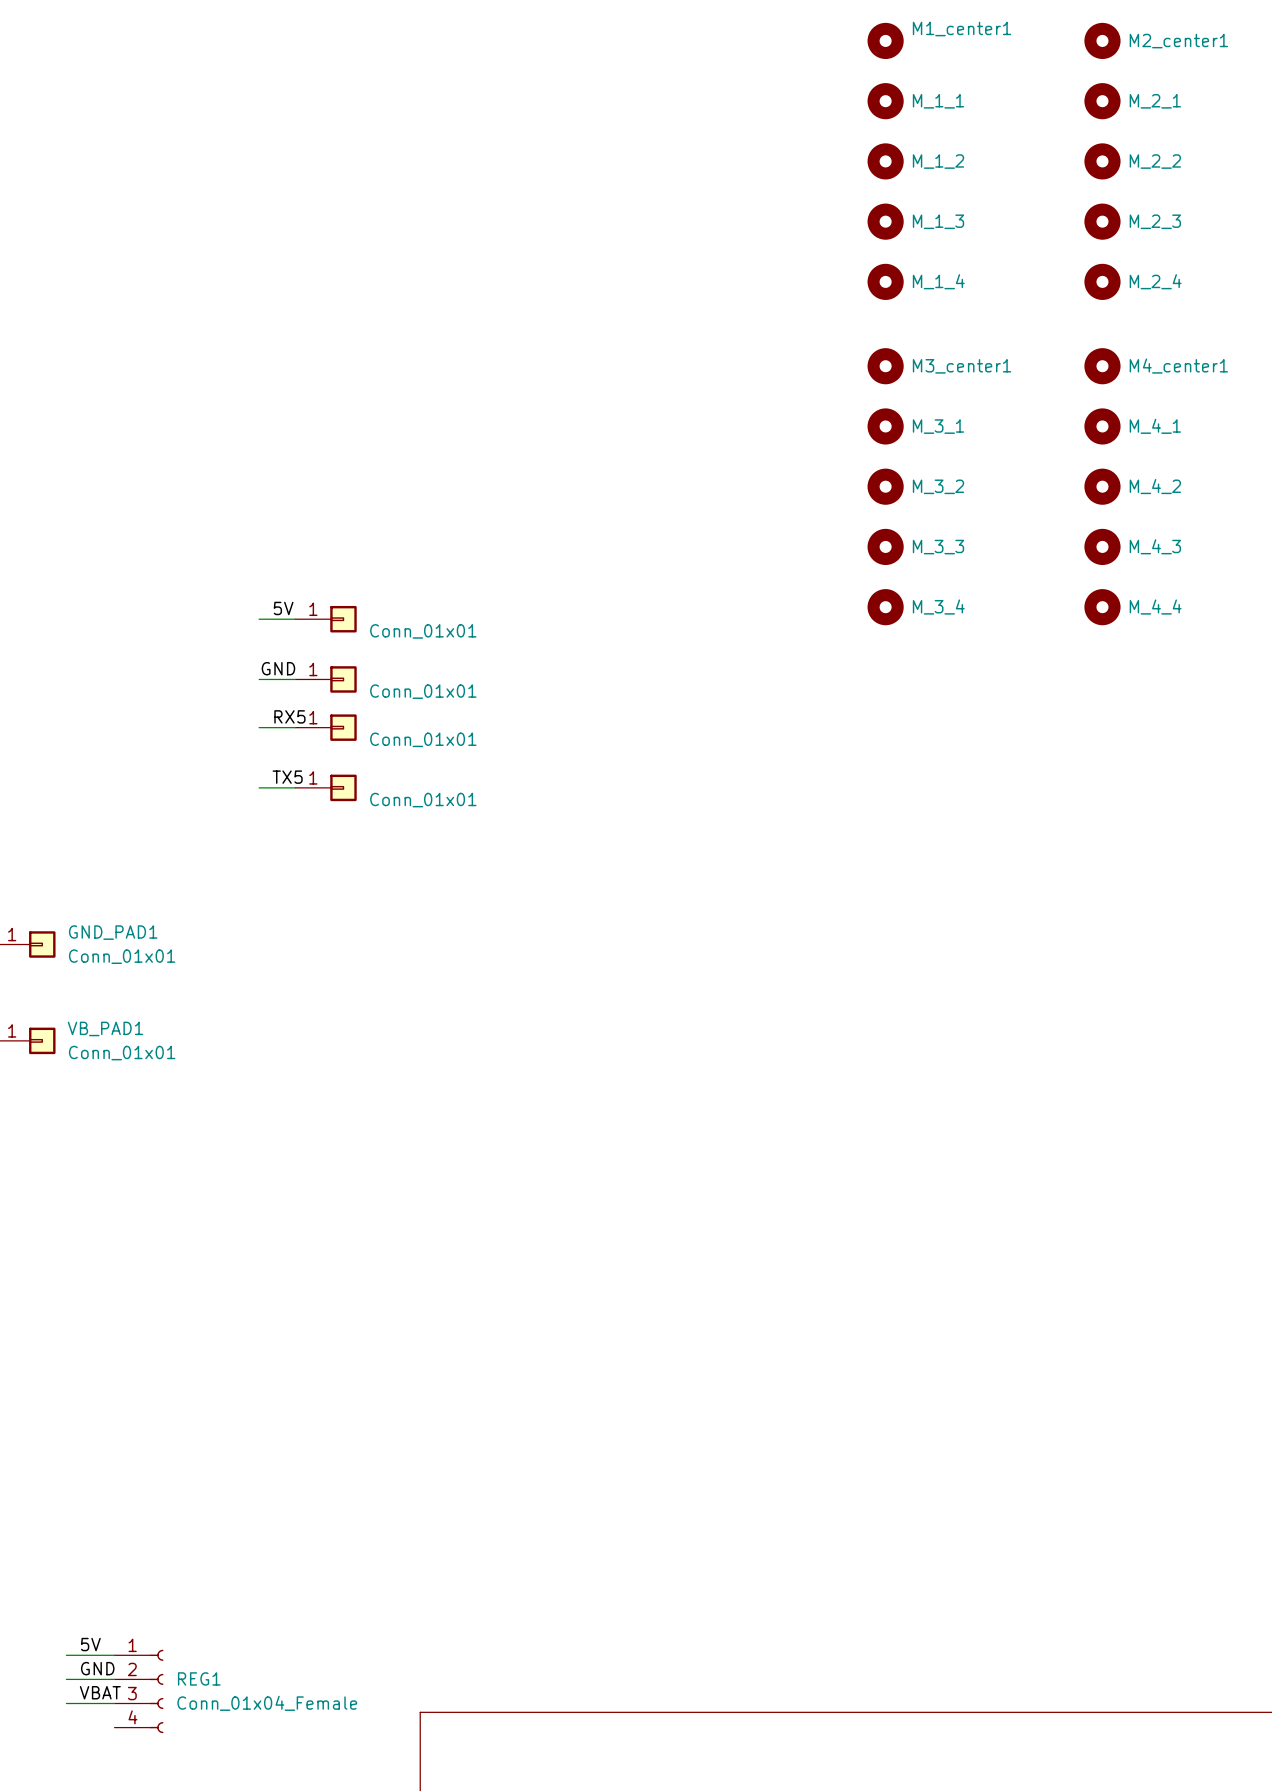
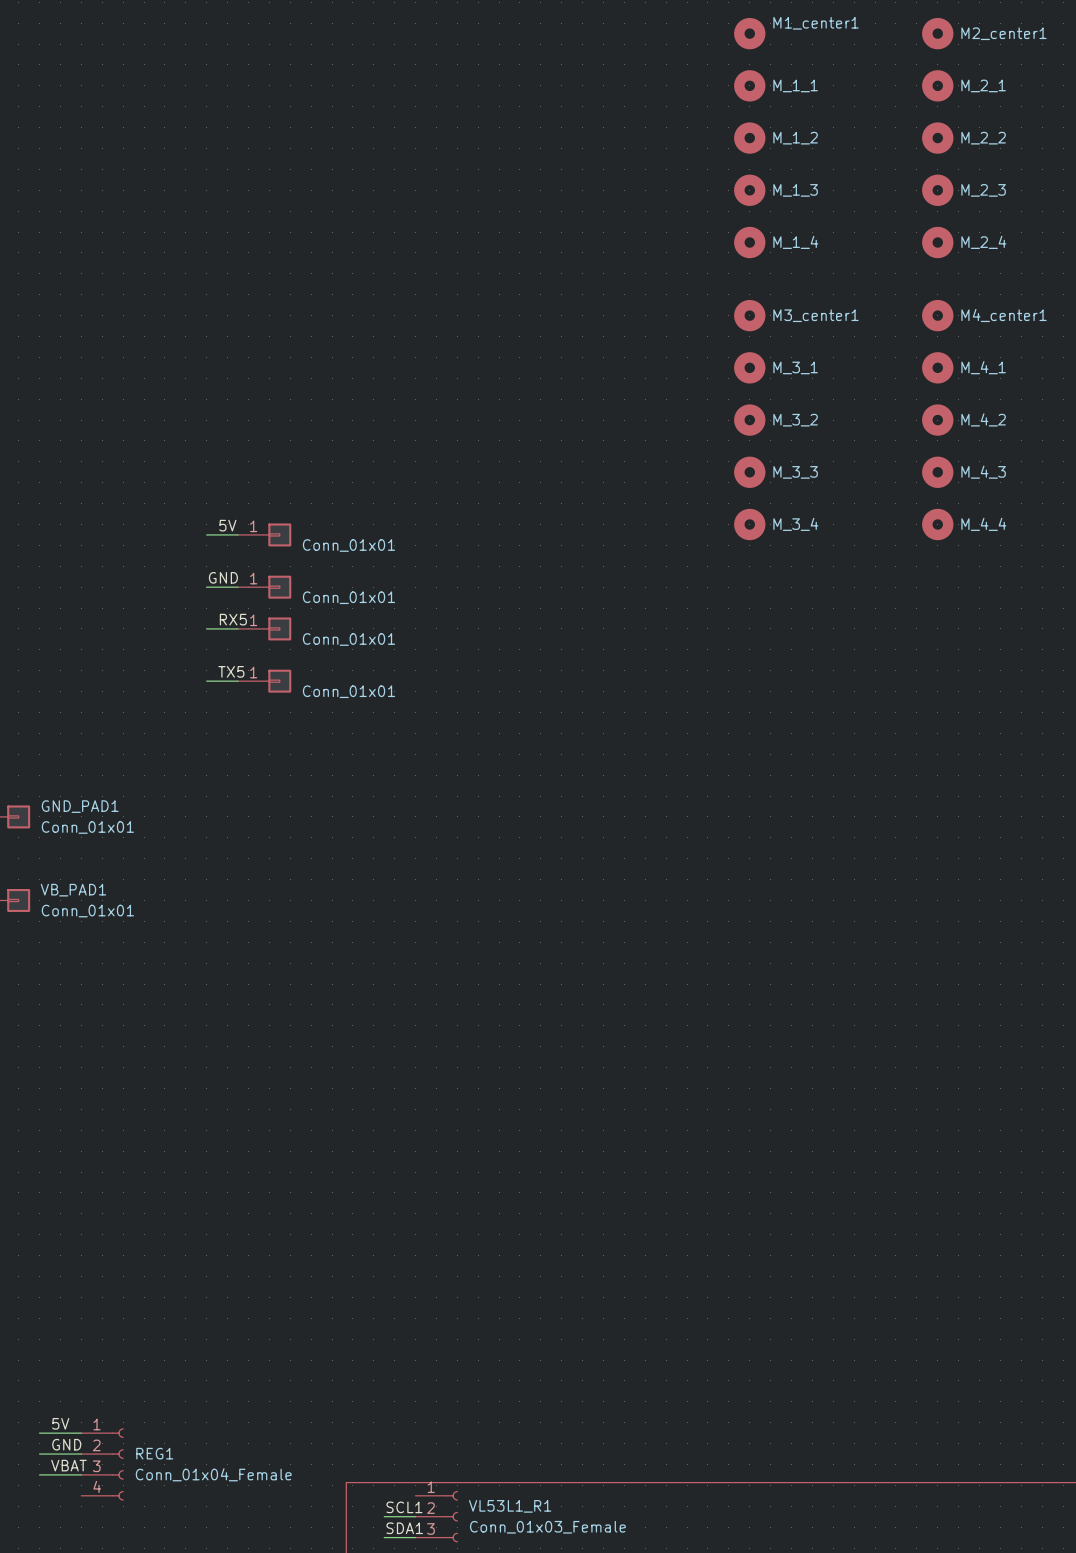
label: none -> SCL1 (404, 1507)
wire: none -> (384, 1516) (415, 1516)
VL53L1_R1: none -> Conn_01x03_Female (436, 1516)
label: none -> SDA1 (404, 1528)
wire: none -> (384, 1537) (415, 1537)

